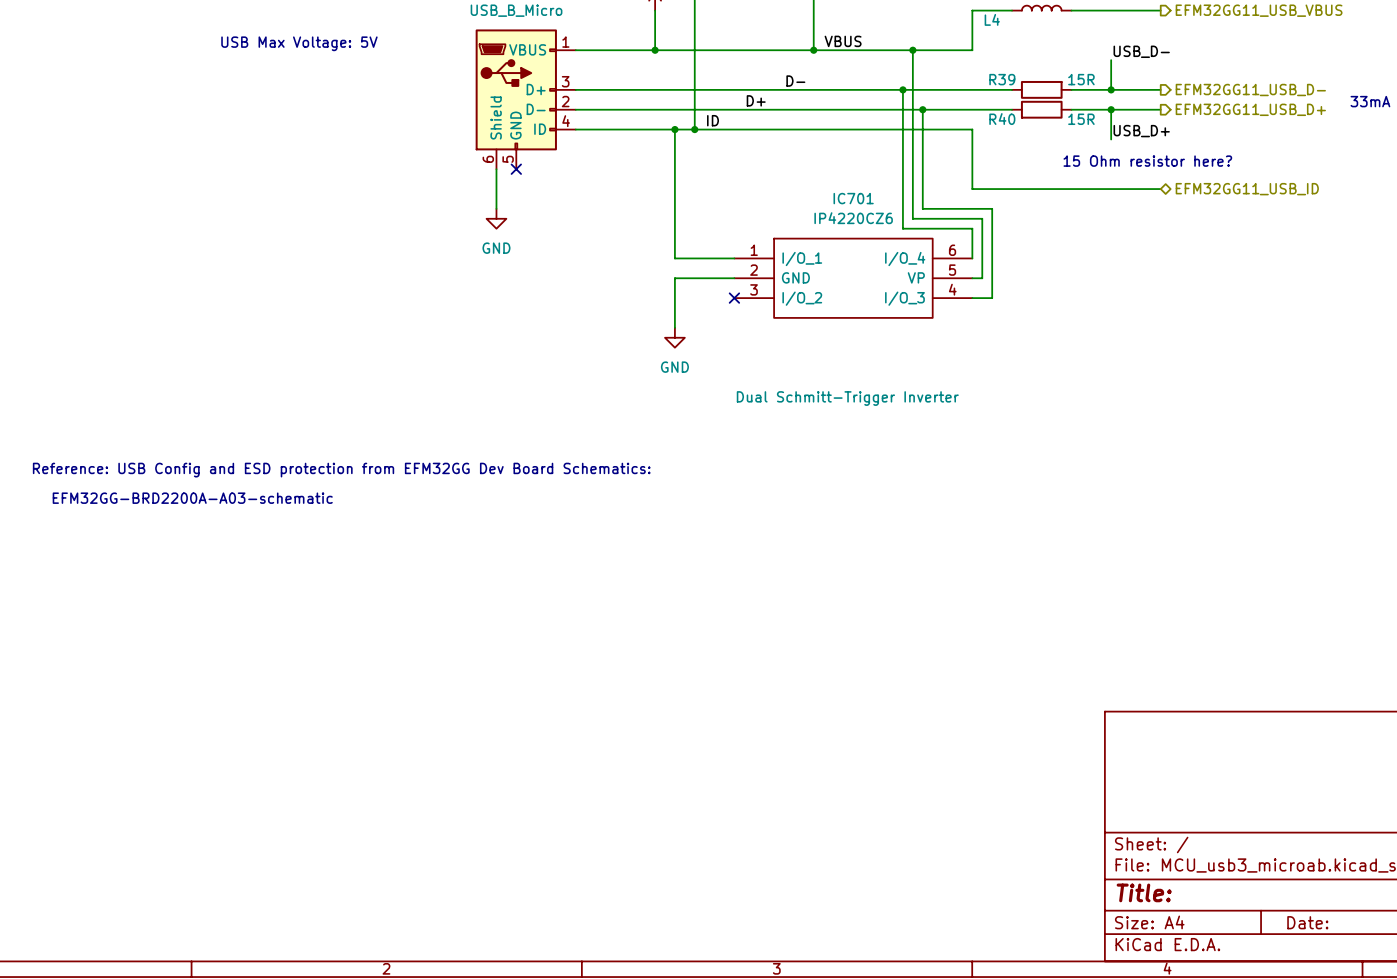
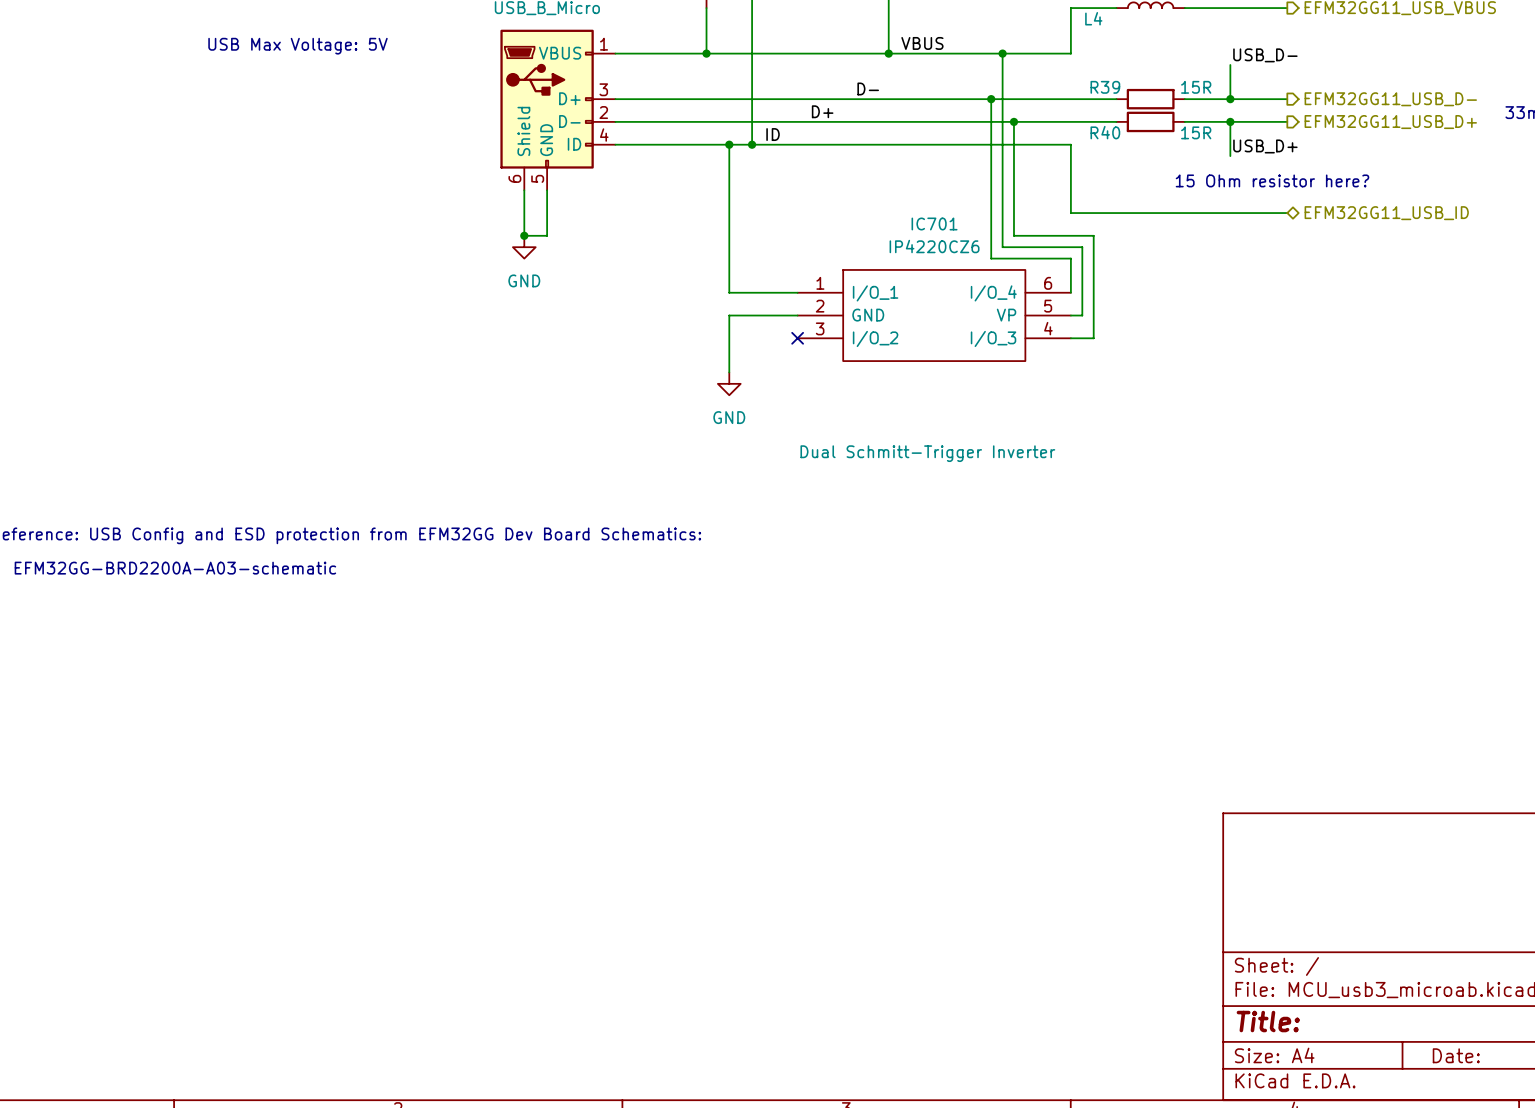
wire: none -> (547, 190) (547, 235) (524, 235)
no-connect mark: (516, 169) -> none
junction: none -> (524, 235)

